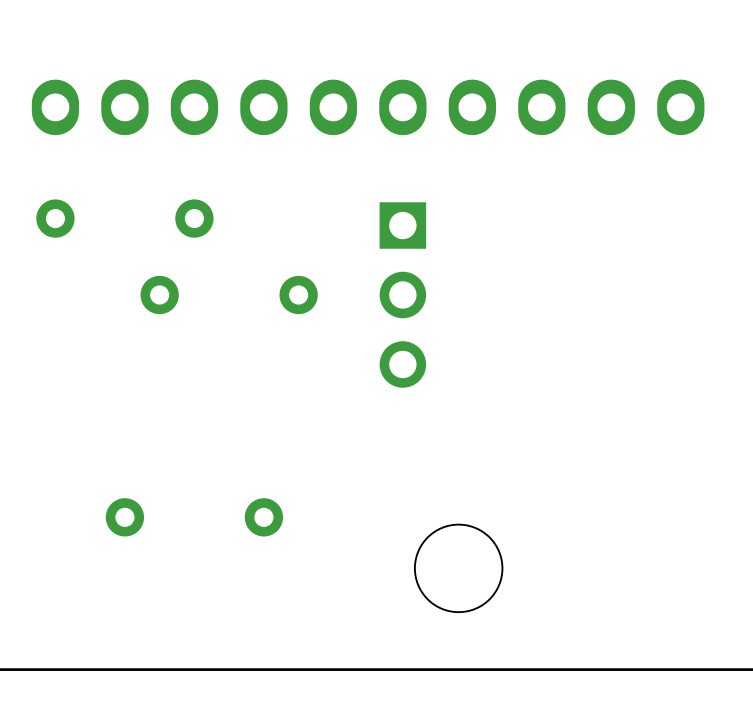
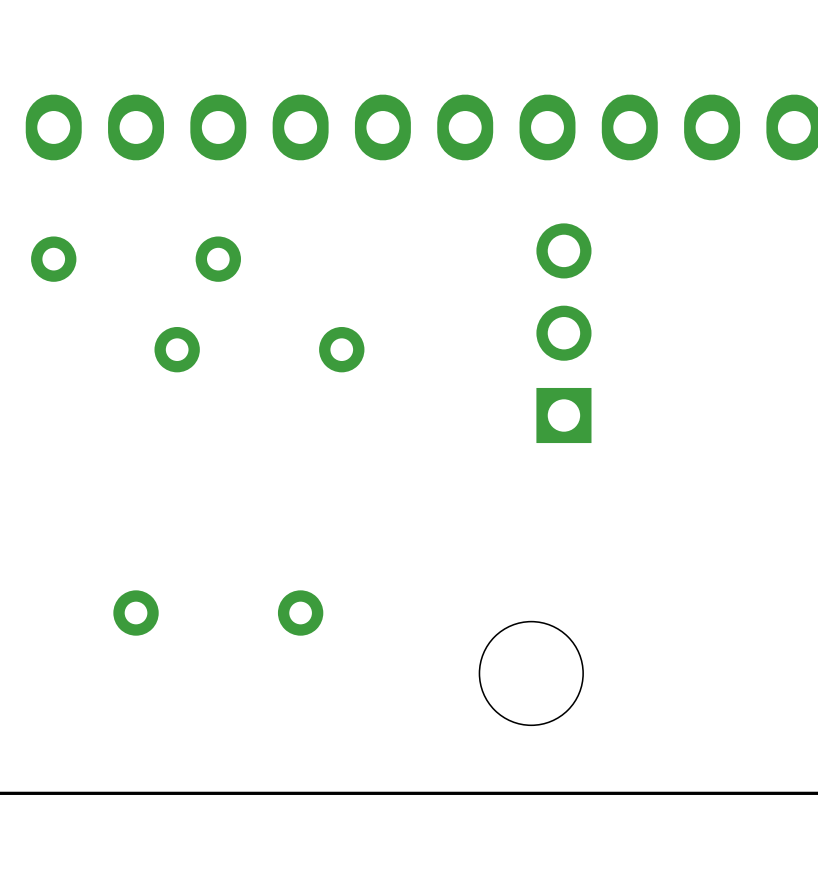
part rotation: 0° (402, 294) -> 180° (563, 333)

